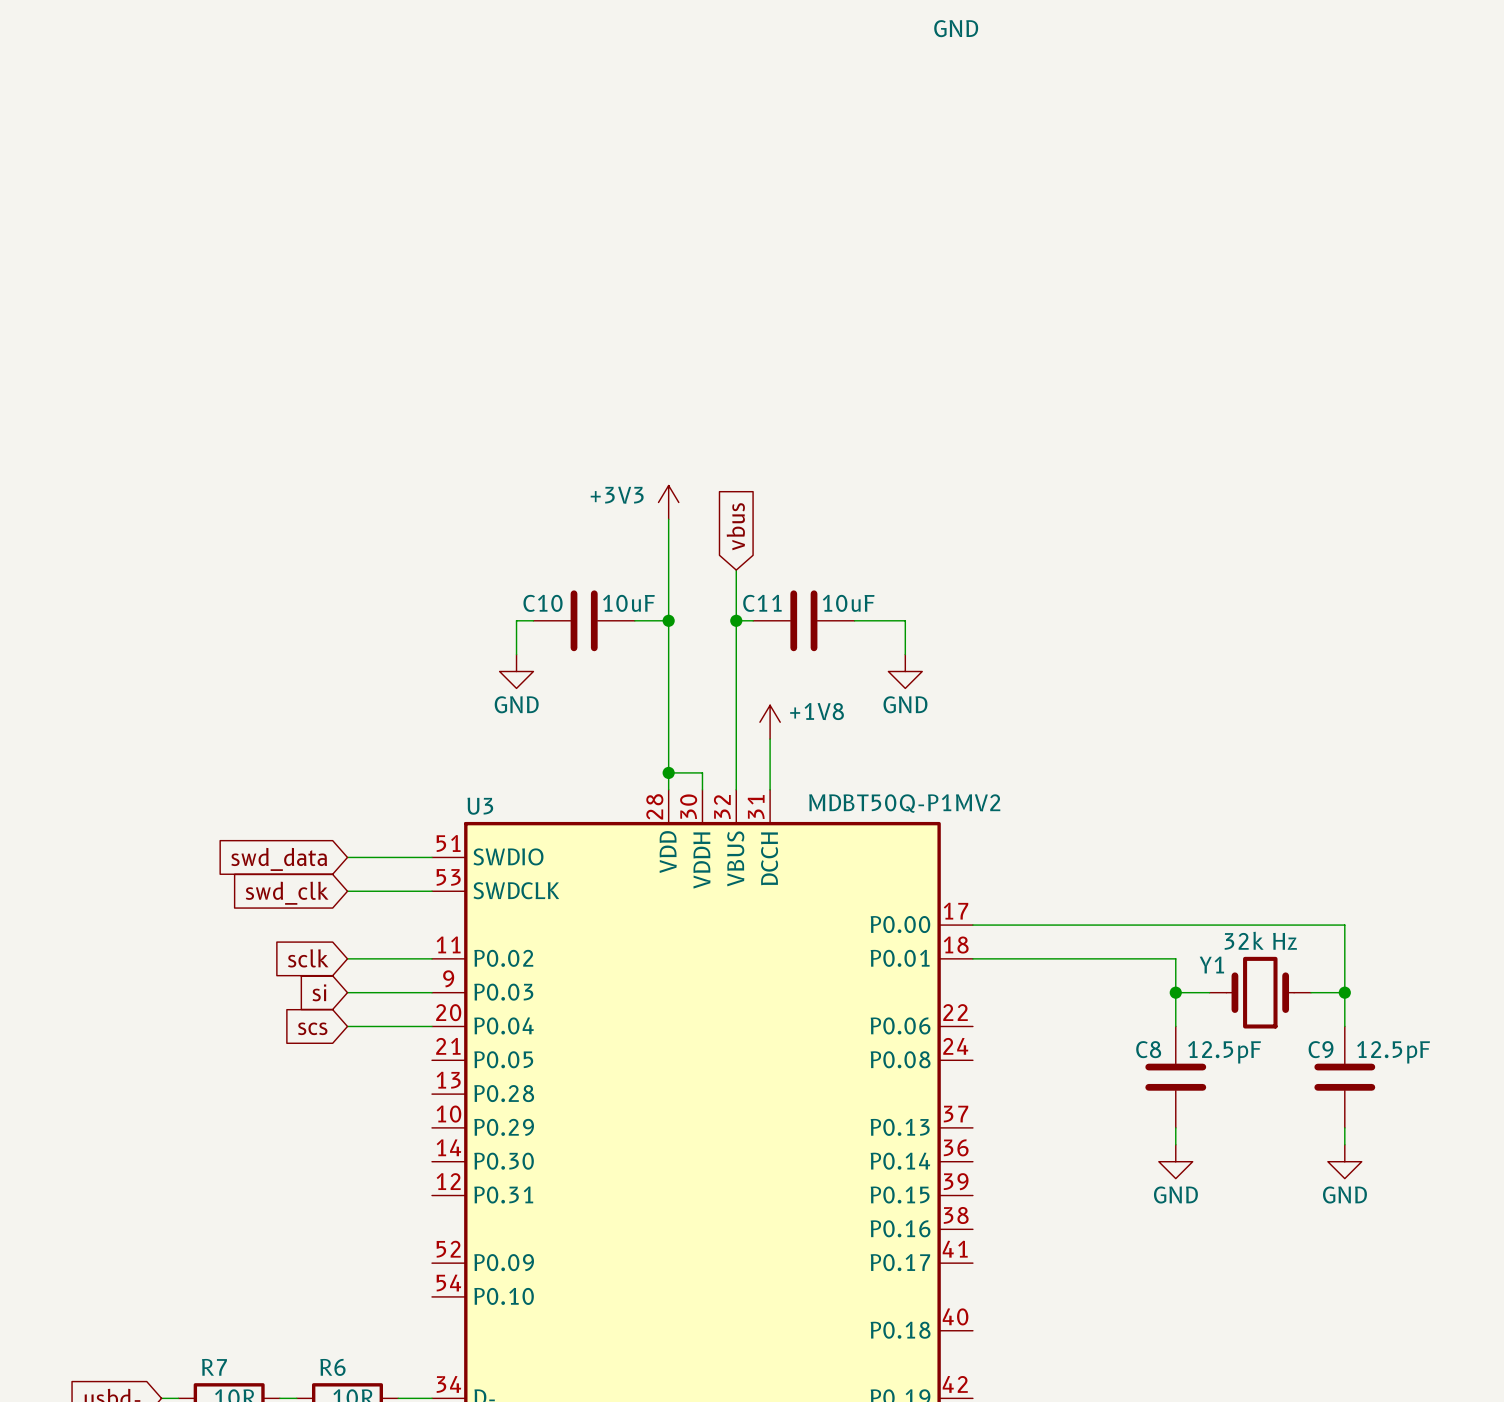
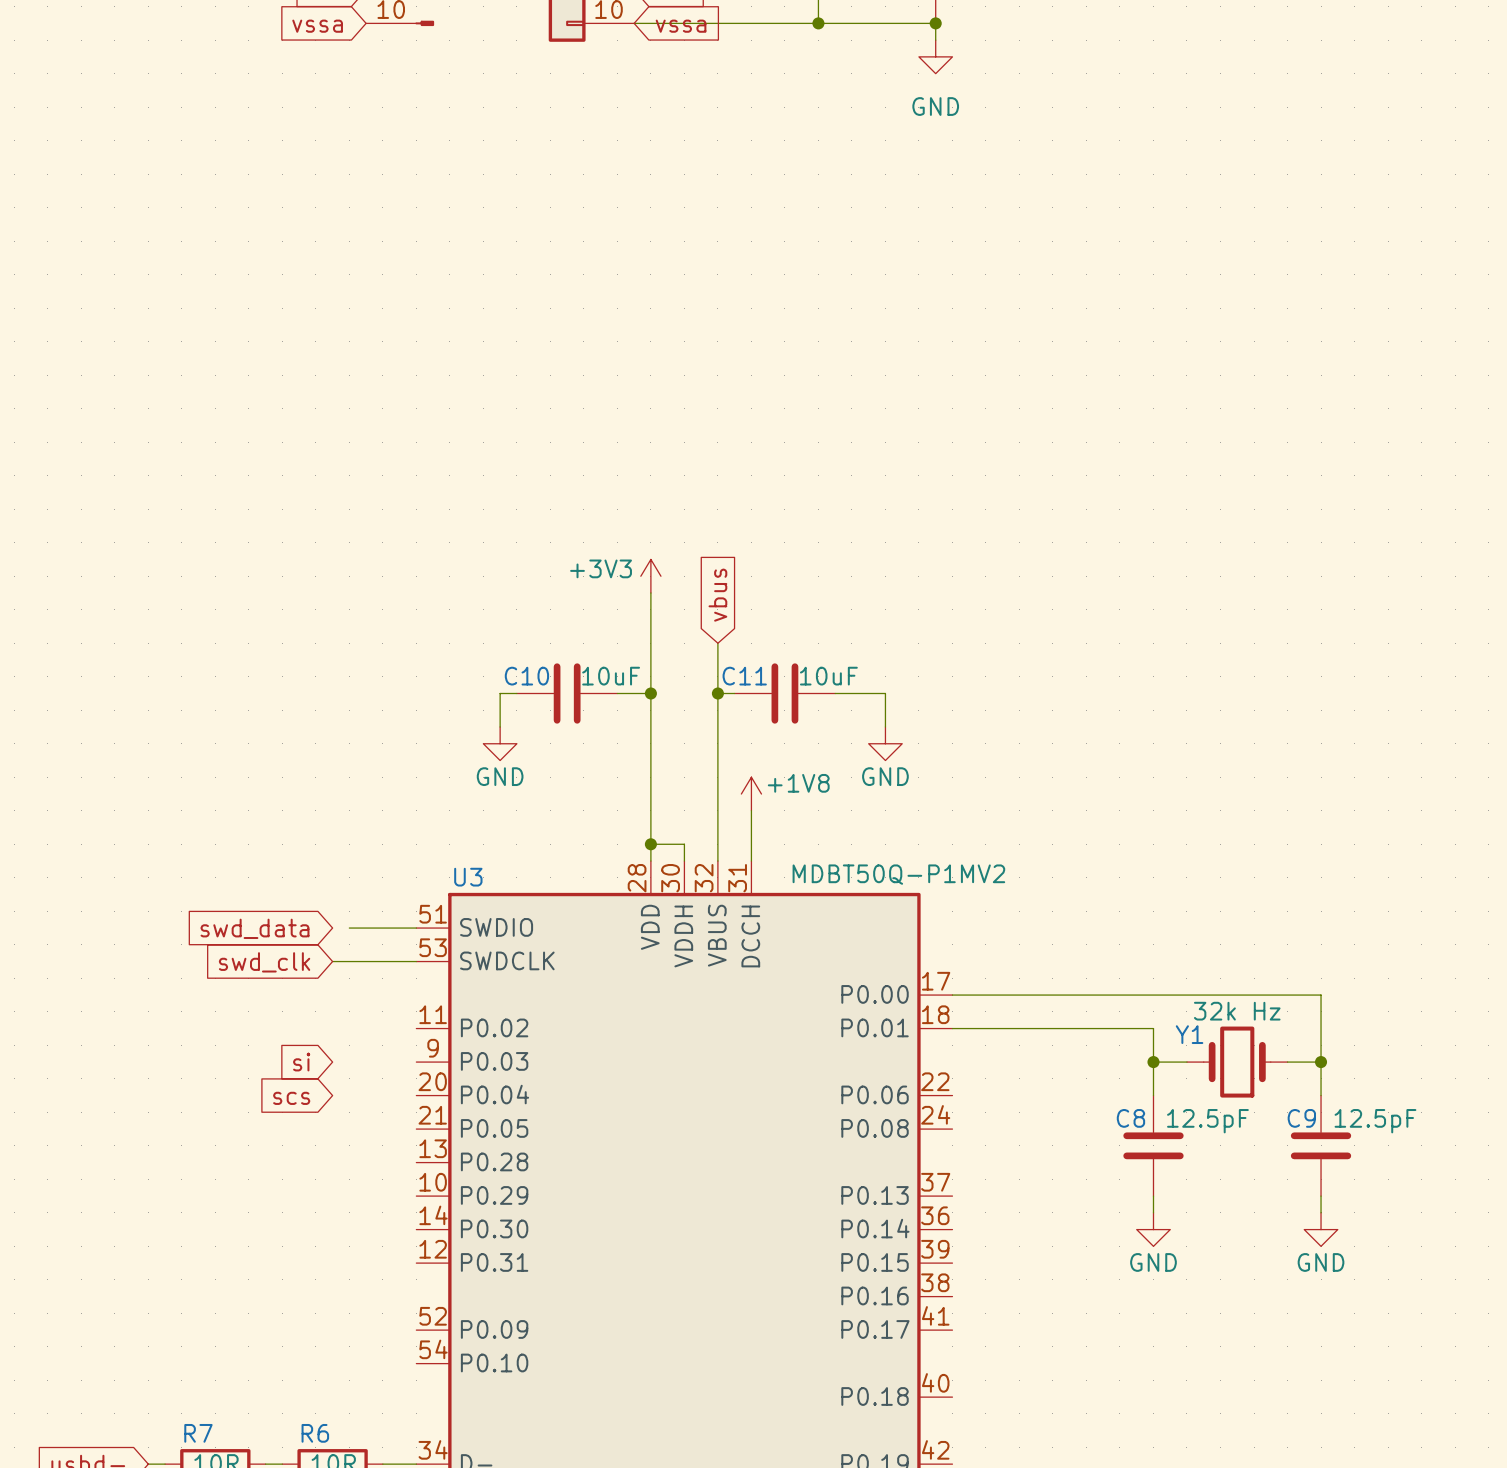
wire: (347, 857) (364, 857) -> none
global label: sclk (308, 958) -> none
wire: (347, 958) (432, 958) -> none
wire: (347, 992) (432, 992) -> none
wire: (347, 1026) (432, 1026) -> none

